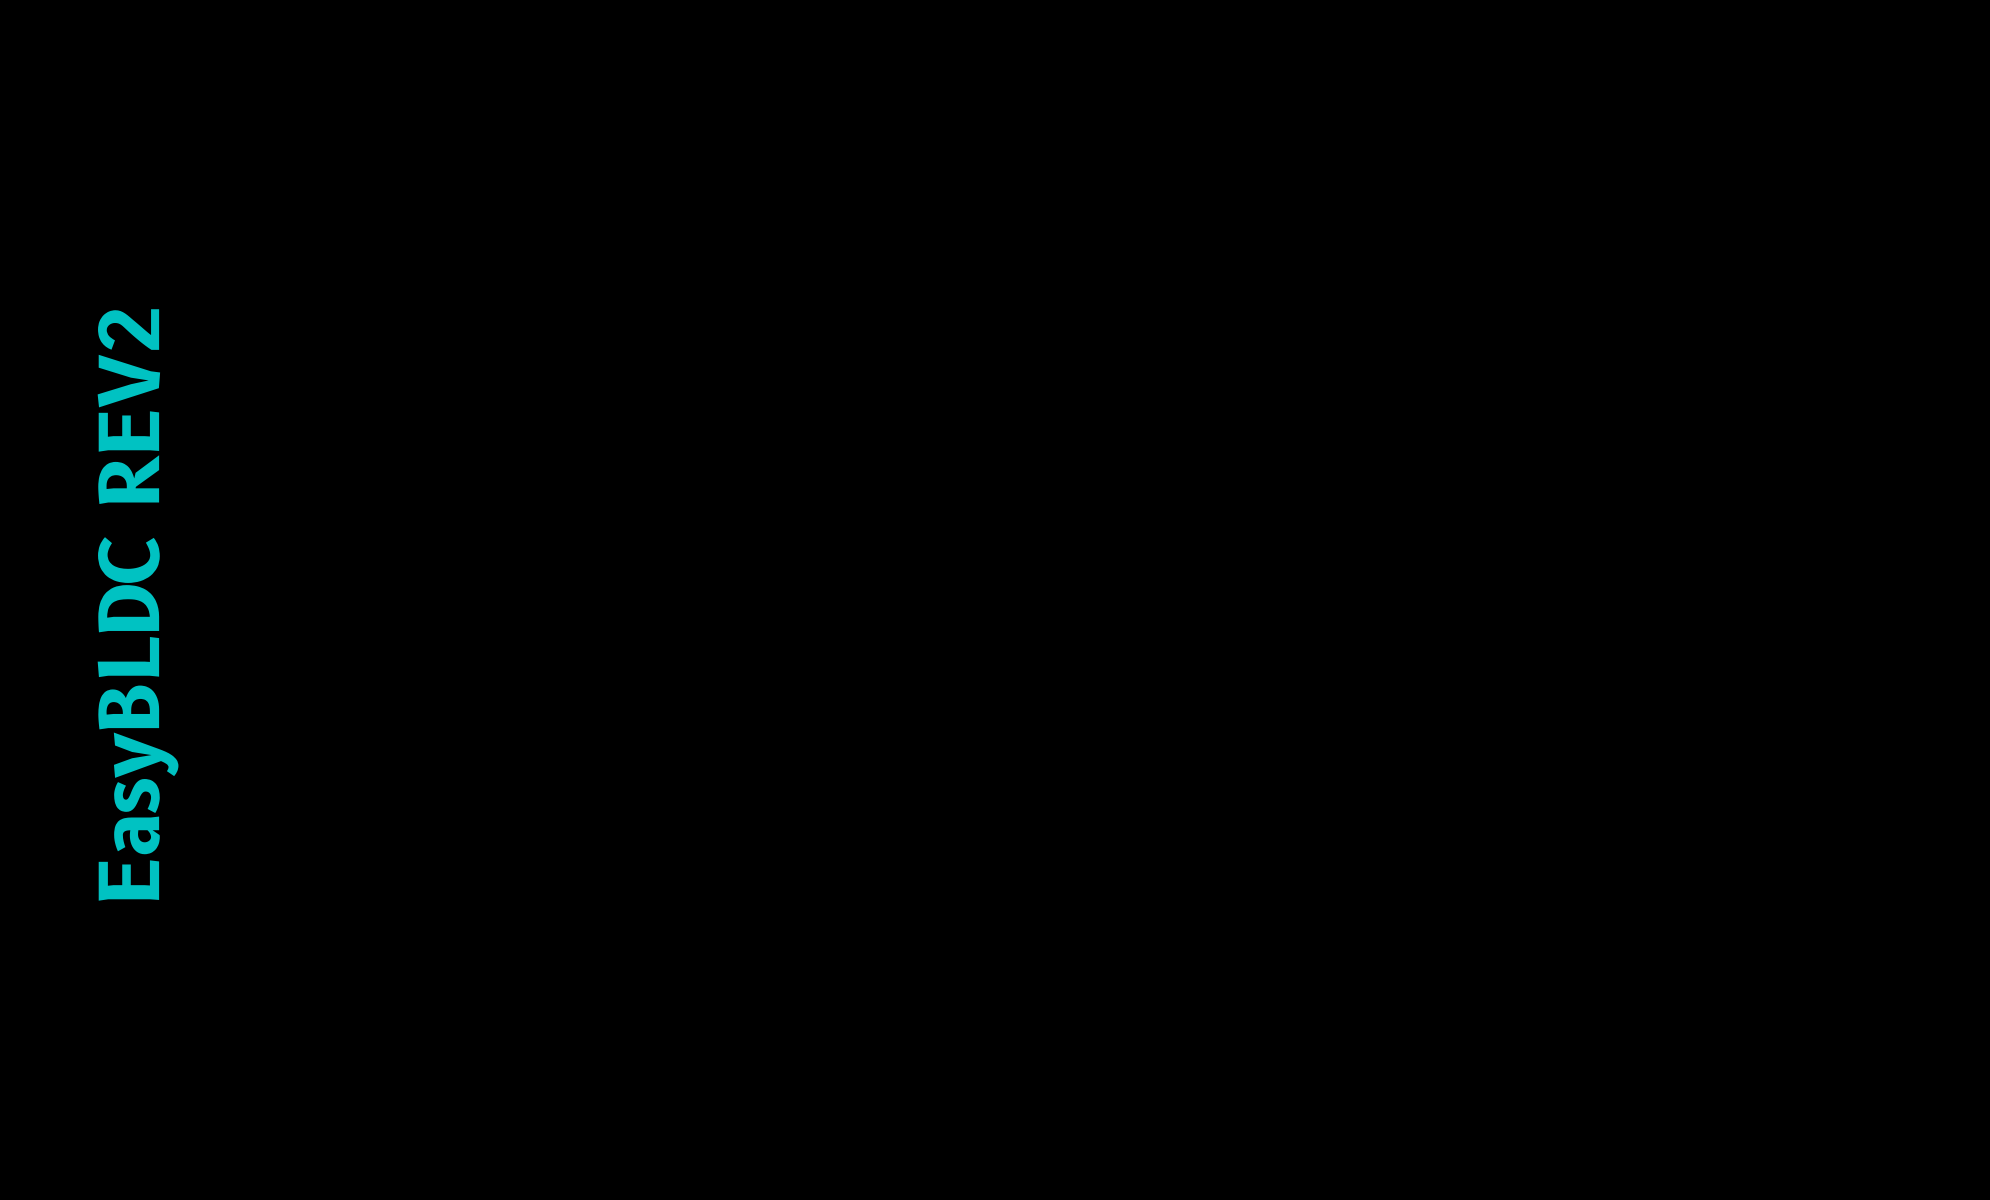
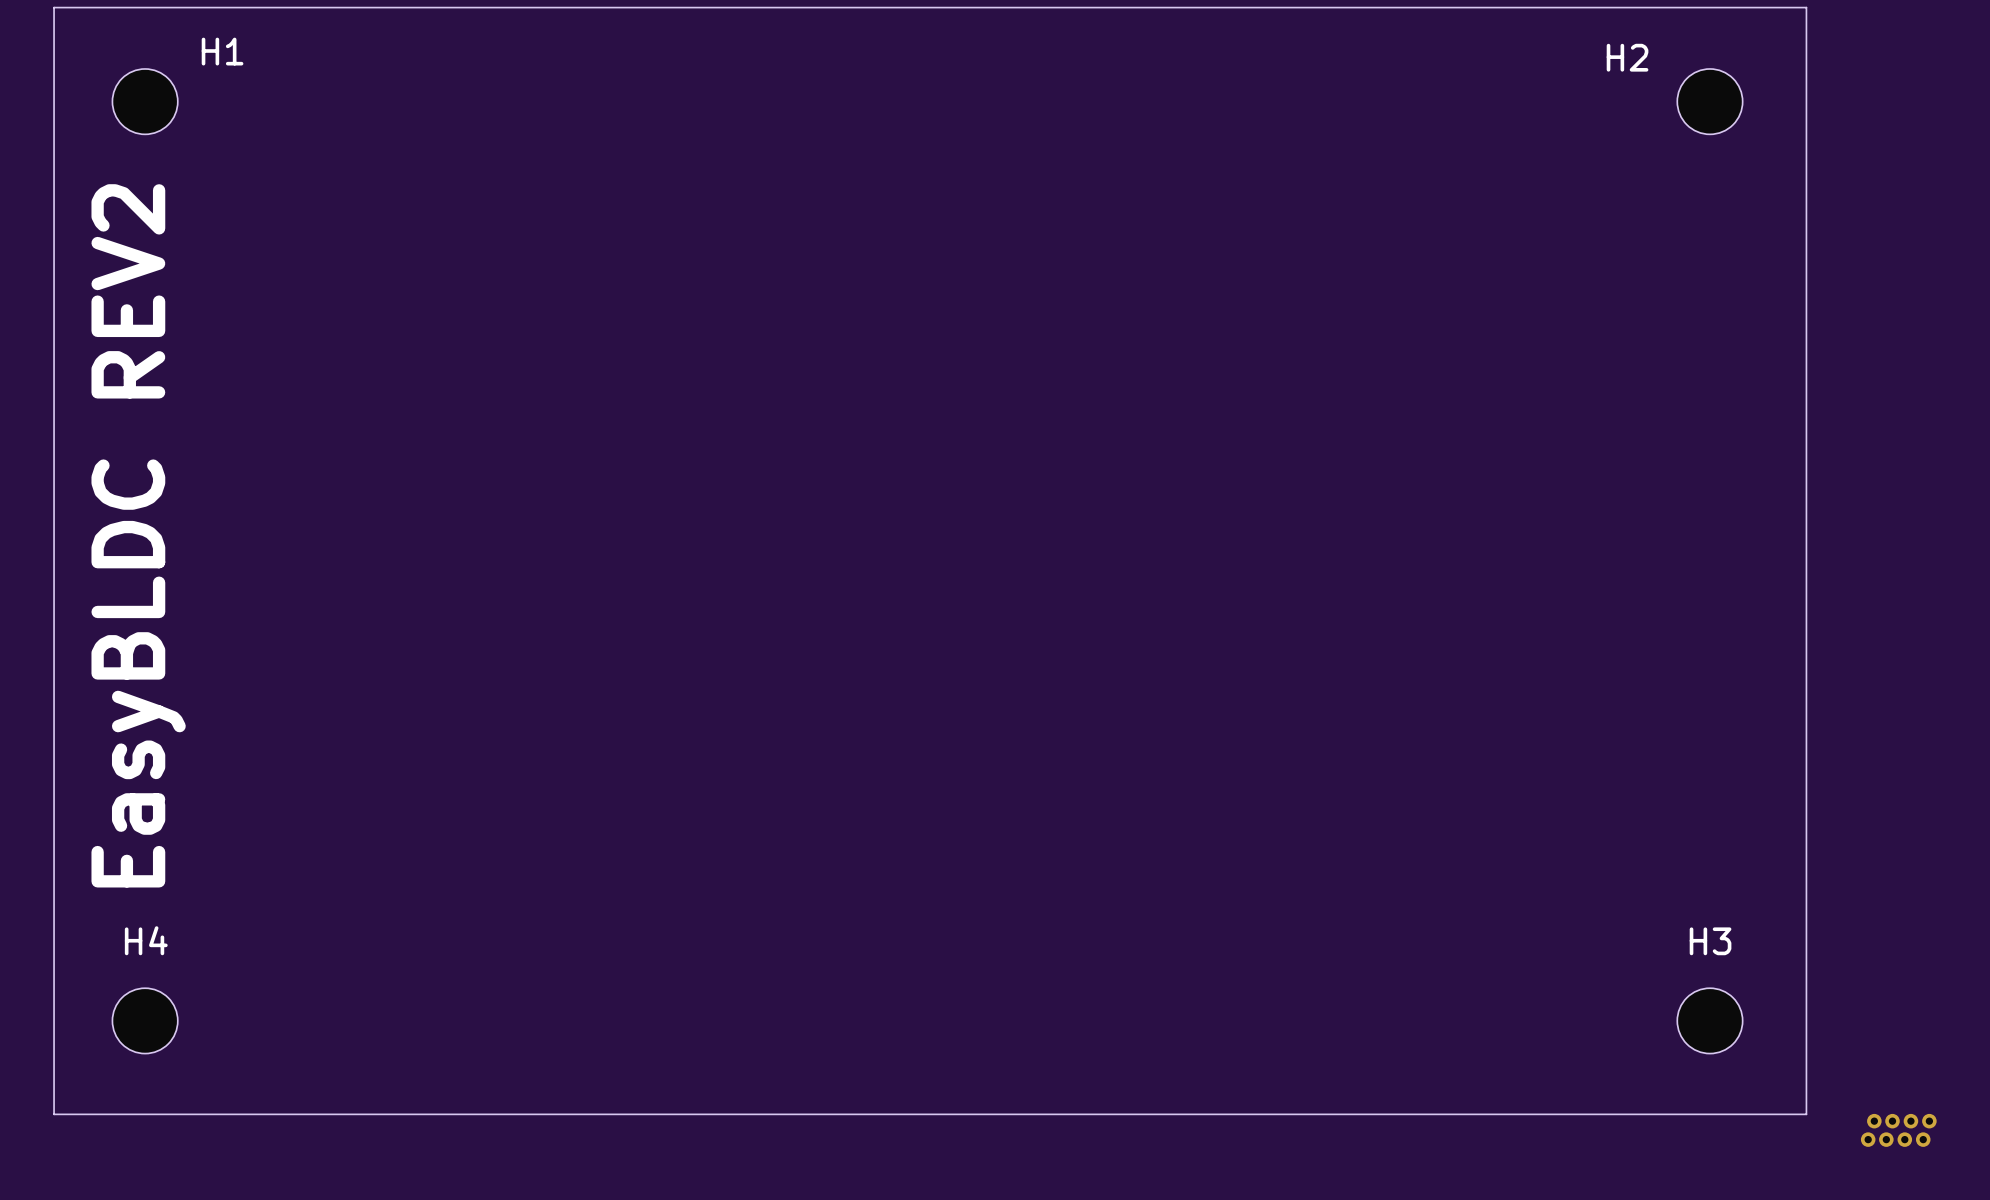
board edge: none -> (54, 7) (1806, 7) (1806, 1114) (54, 1114) (54, 7)
H1: none -> (145, 101)
H2: none -> (1709, 101)
H4: none -> (145, 1020)
H3: none -> (1709, 1020)
via: none -> (1874, 1121)
via: none -> (1892, 1121)
via: none -> (1910, 1121)
via: none -> (1929, 1121)
via: none -> (1868, 1139)
via: none -> (1886, 1139)
via: none -> (1904, 1139)
via: none -> (1923, 1139)

